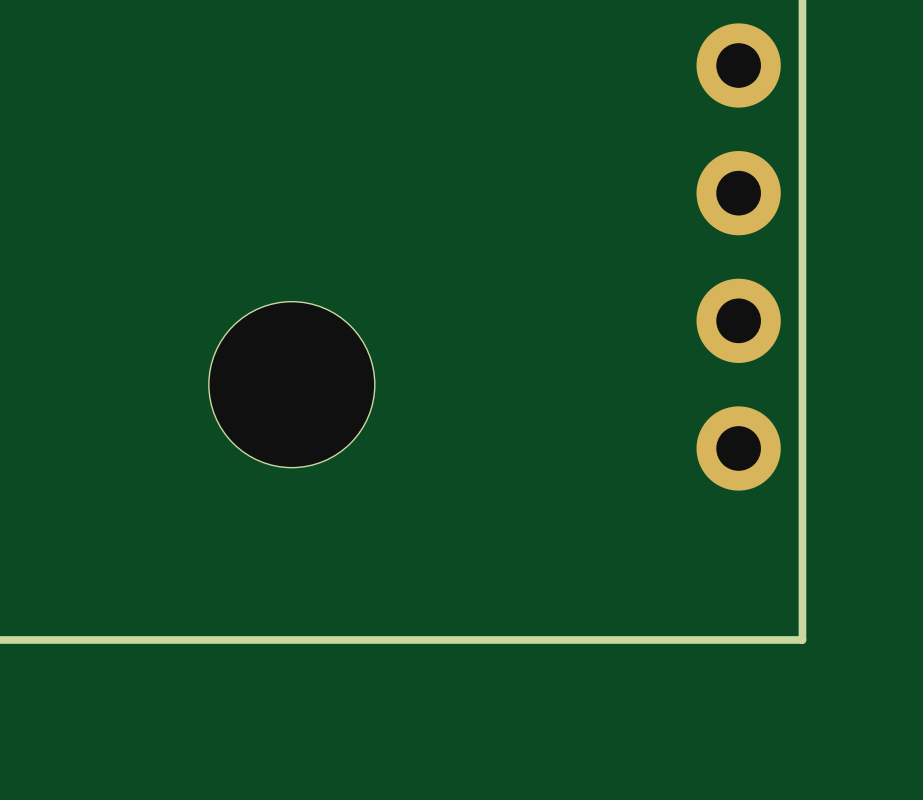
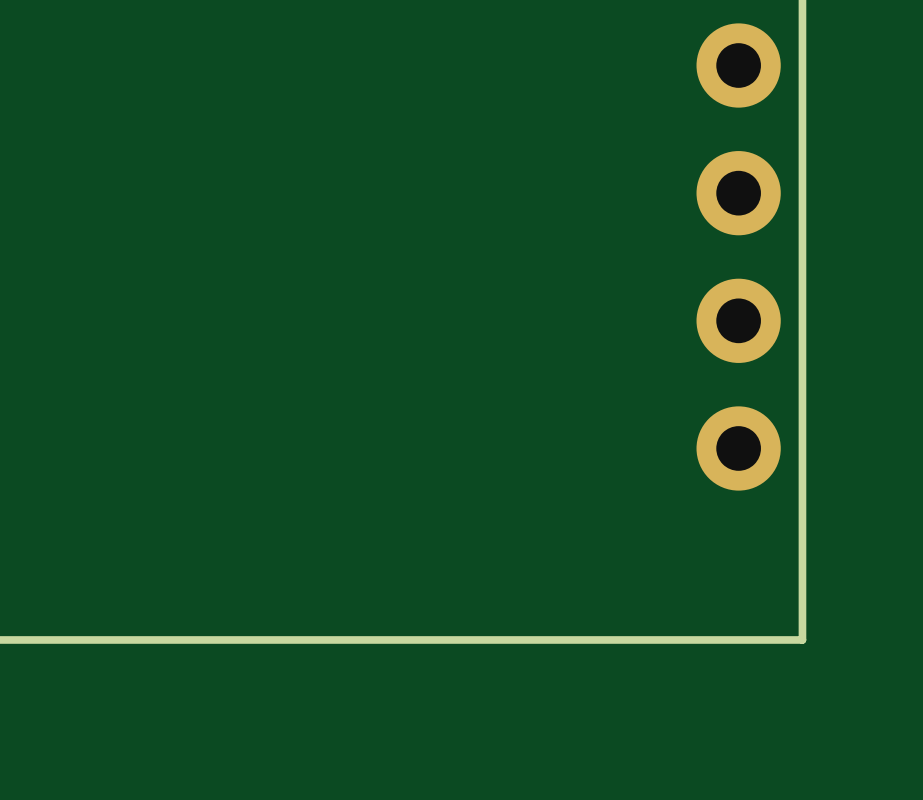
part: (291, 384) -> none

